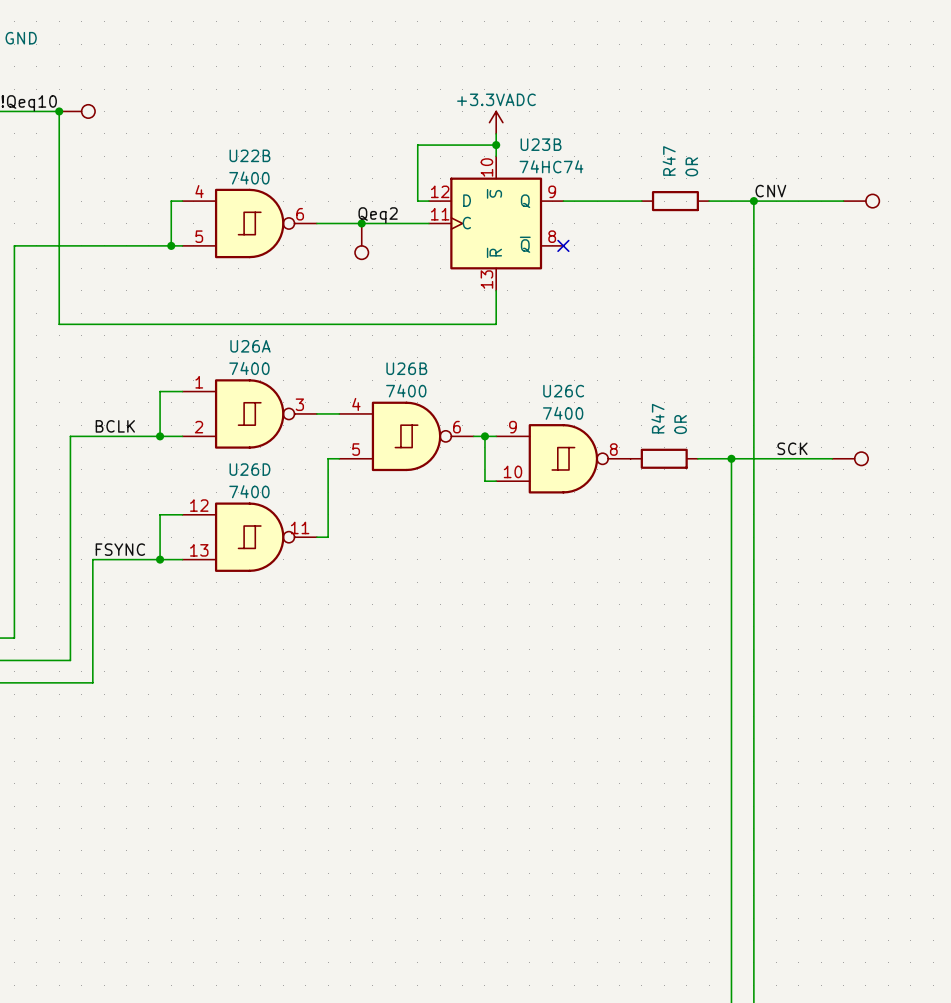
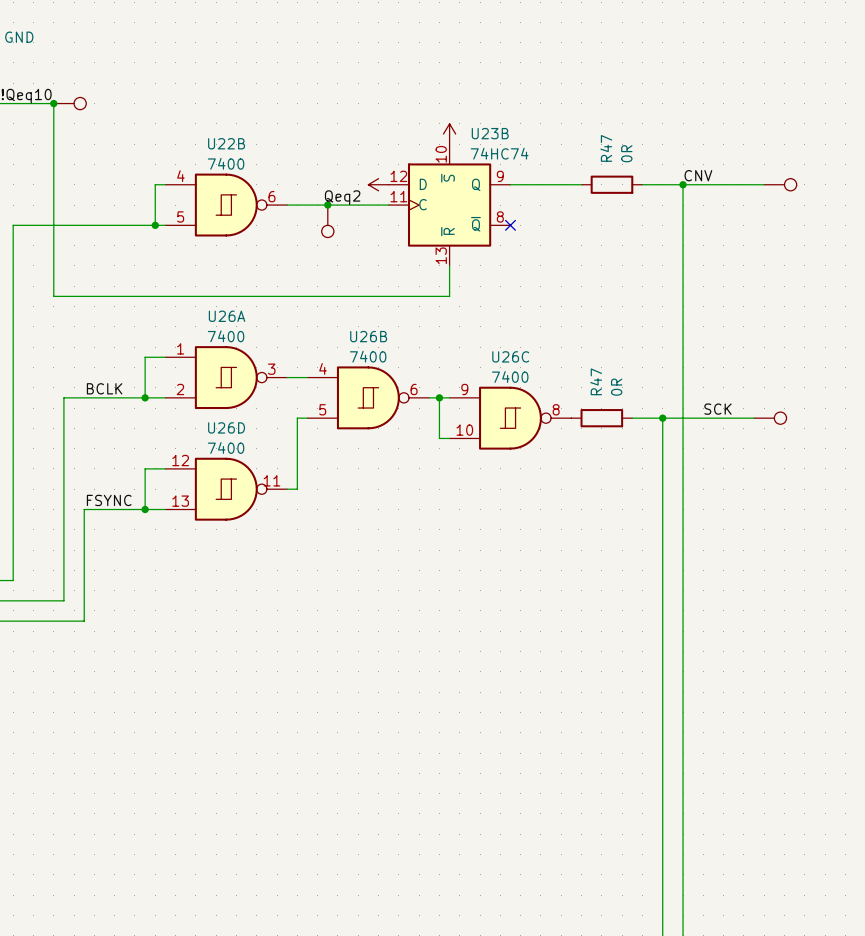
power symbol: +3.3VADC (496, 122) -> none
wire: (496, 145) (417, 145) (417, 201) (428, 201) -> none
junction: (496, 145) -> none
power symbol: none -> (449, 134)
power symbol: none -> (378, 184)

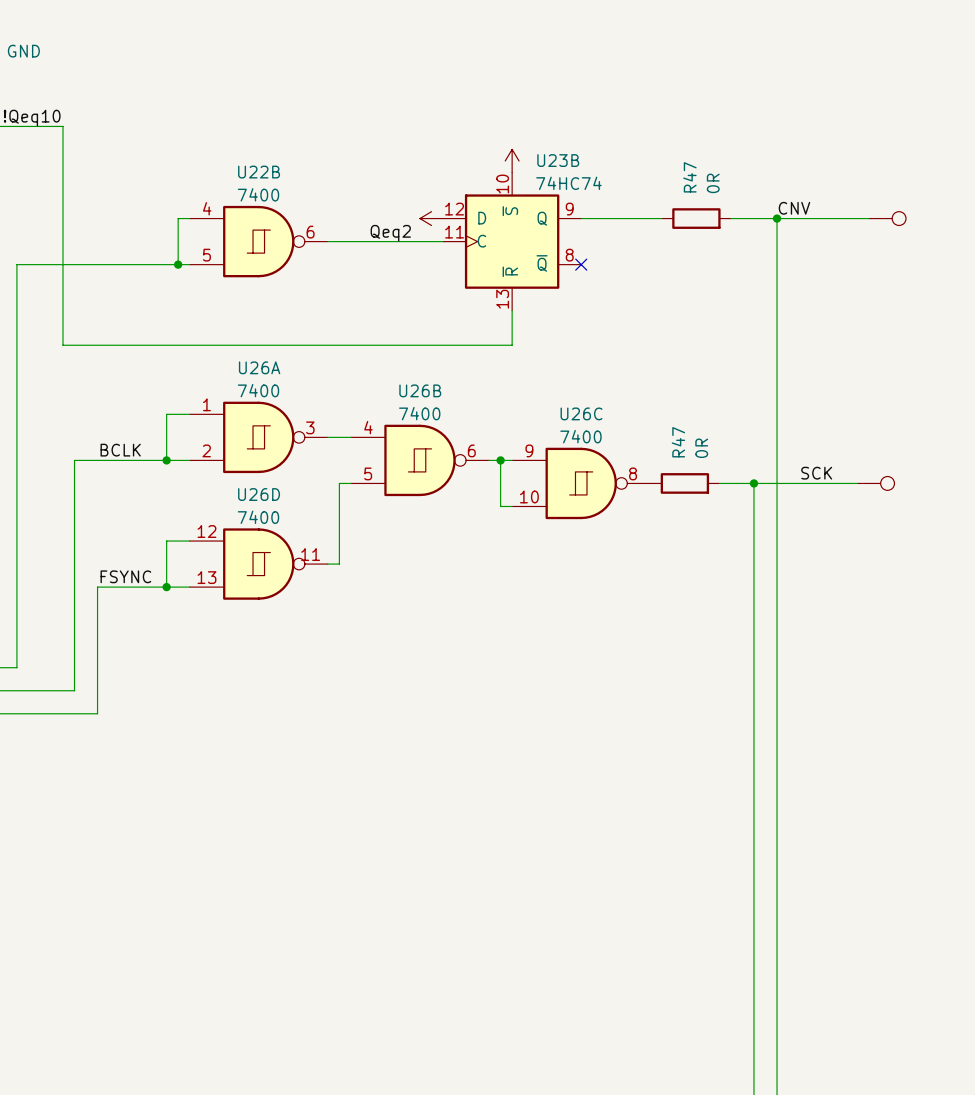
junction: (53, 103) -> none
part: (70, 103) -> none
junction: (327, 205) -> none
part: (327, 221) -> none

